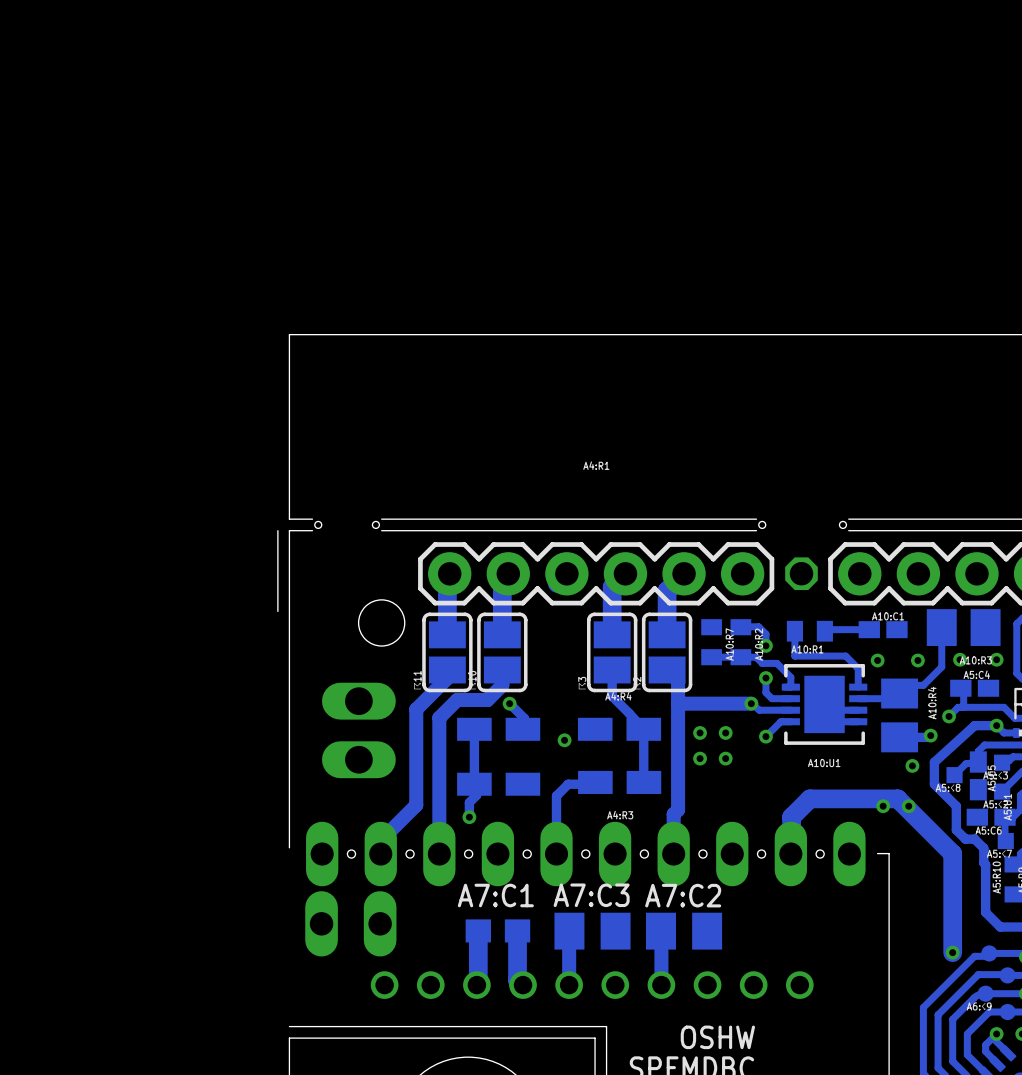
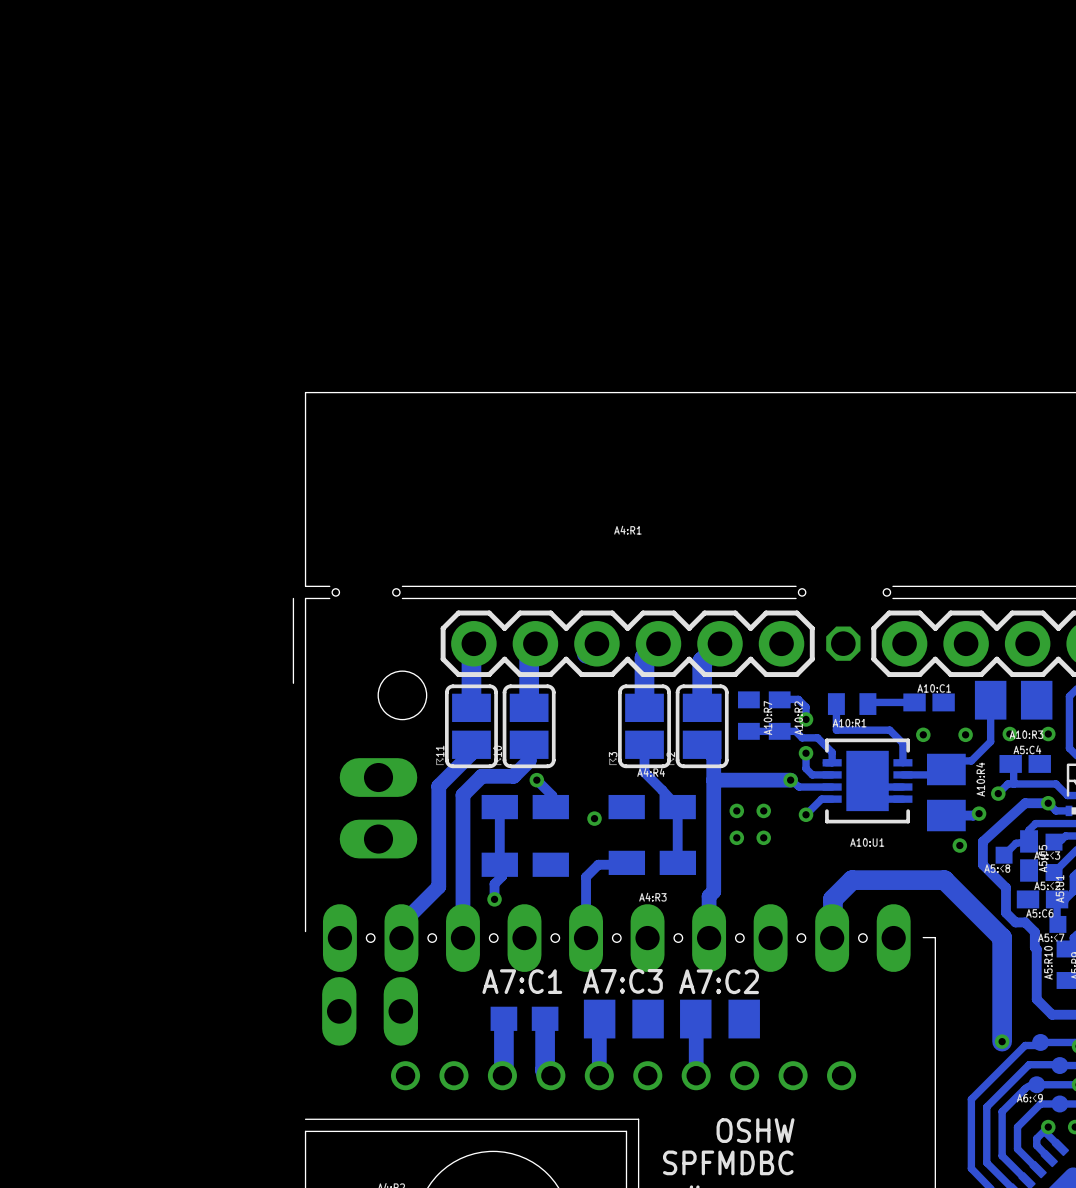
via: (883, 806) -> none
via: (908, 806) -> none

